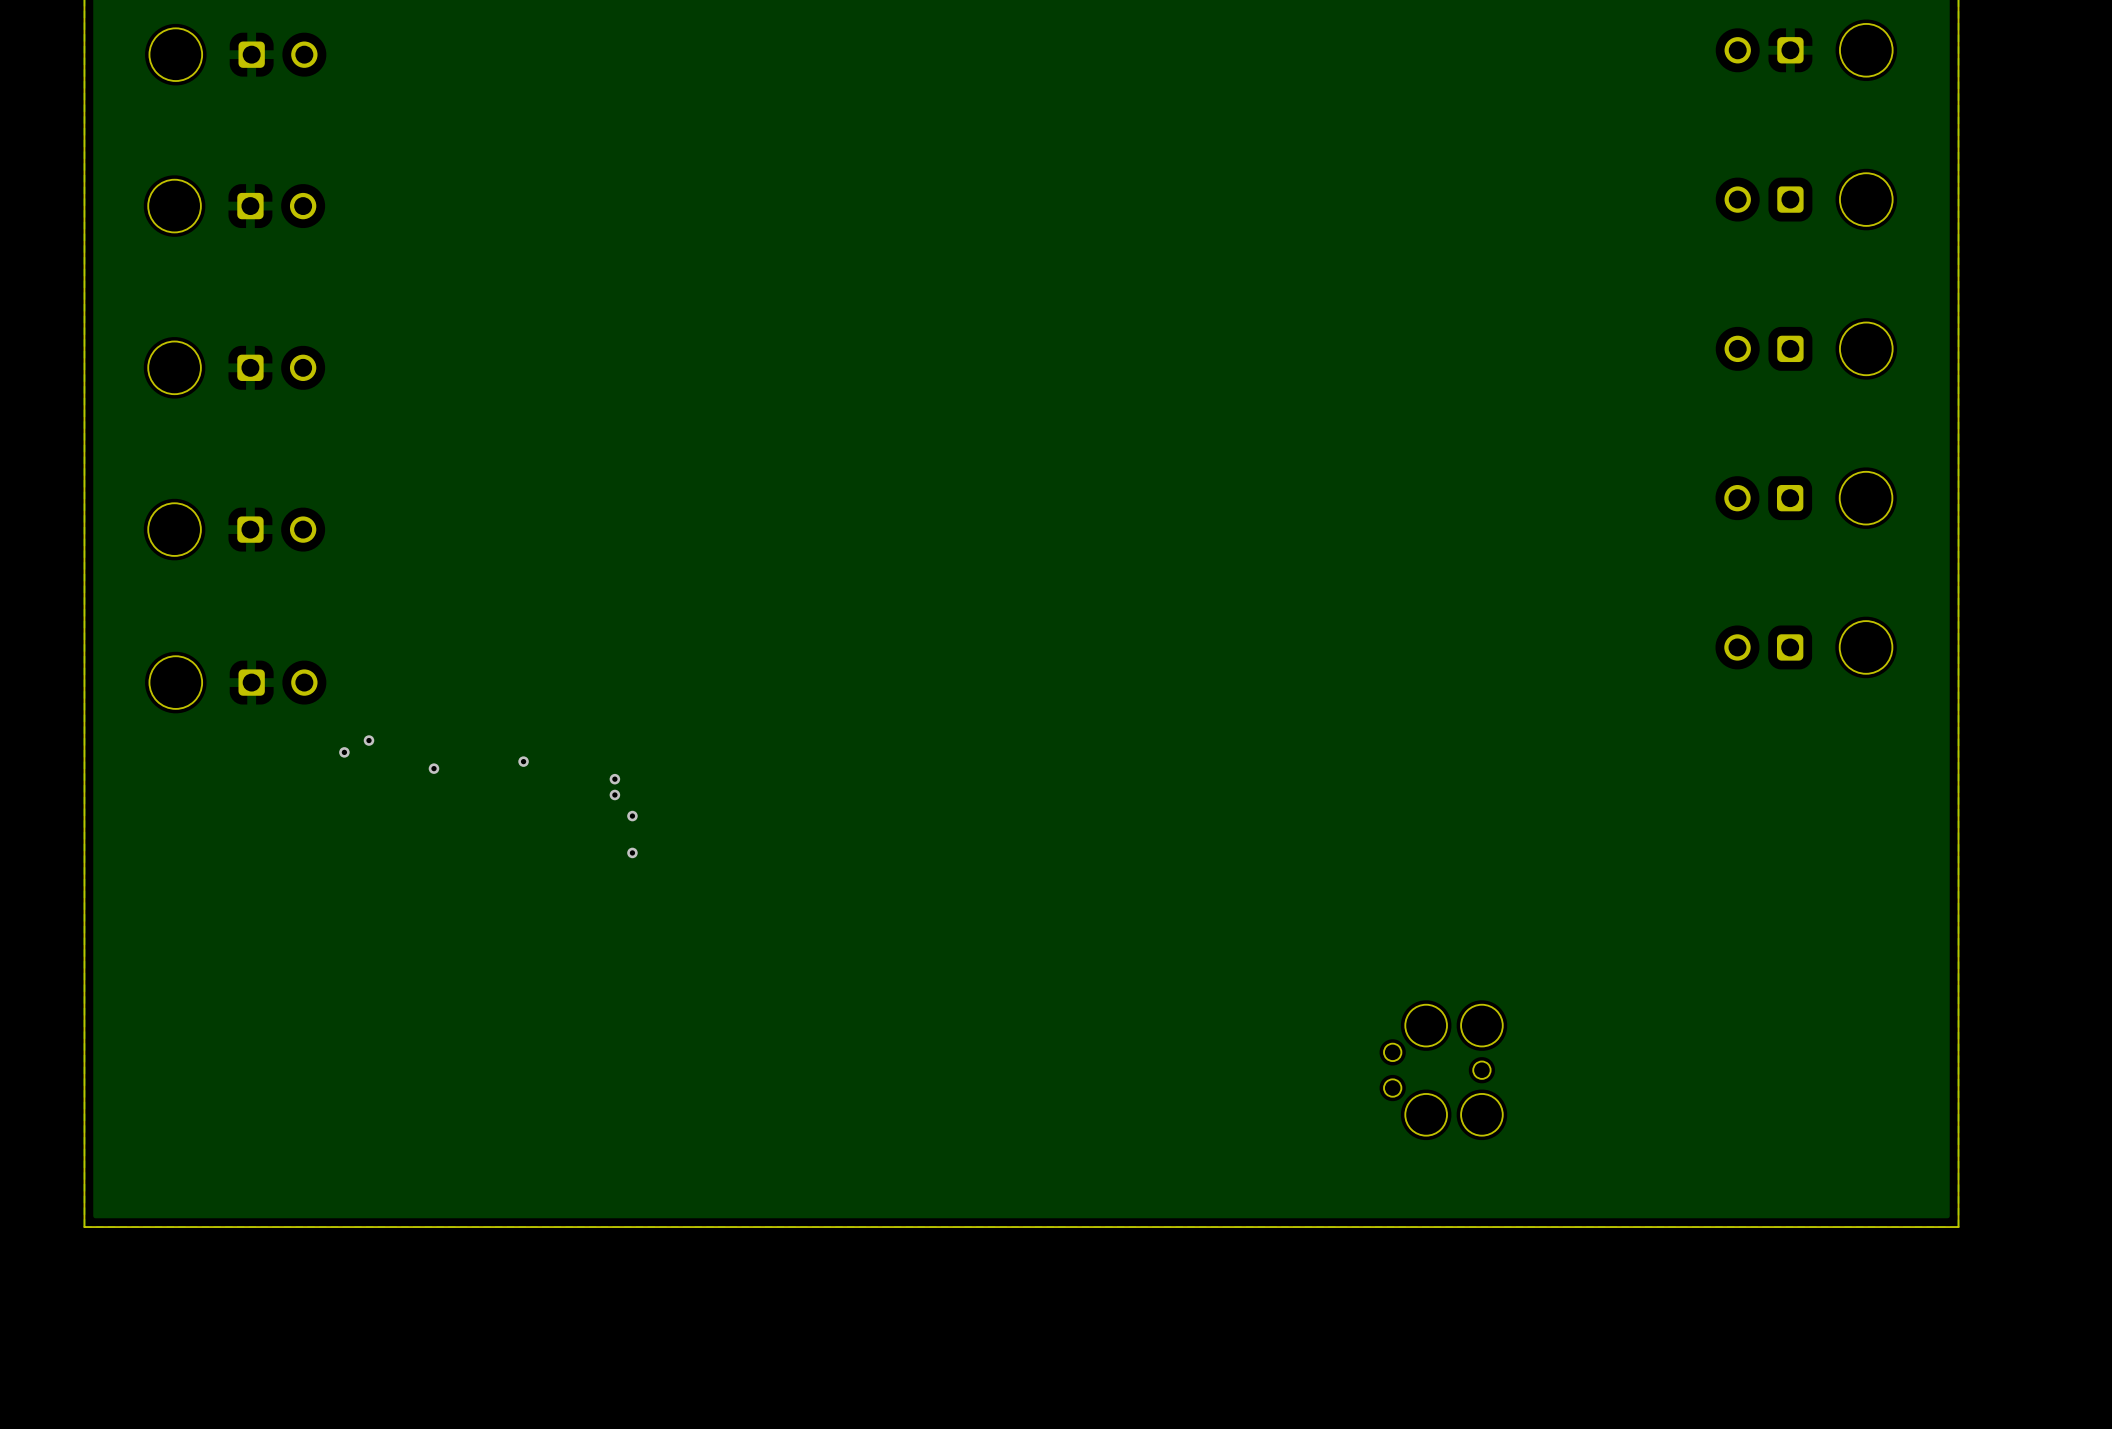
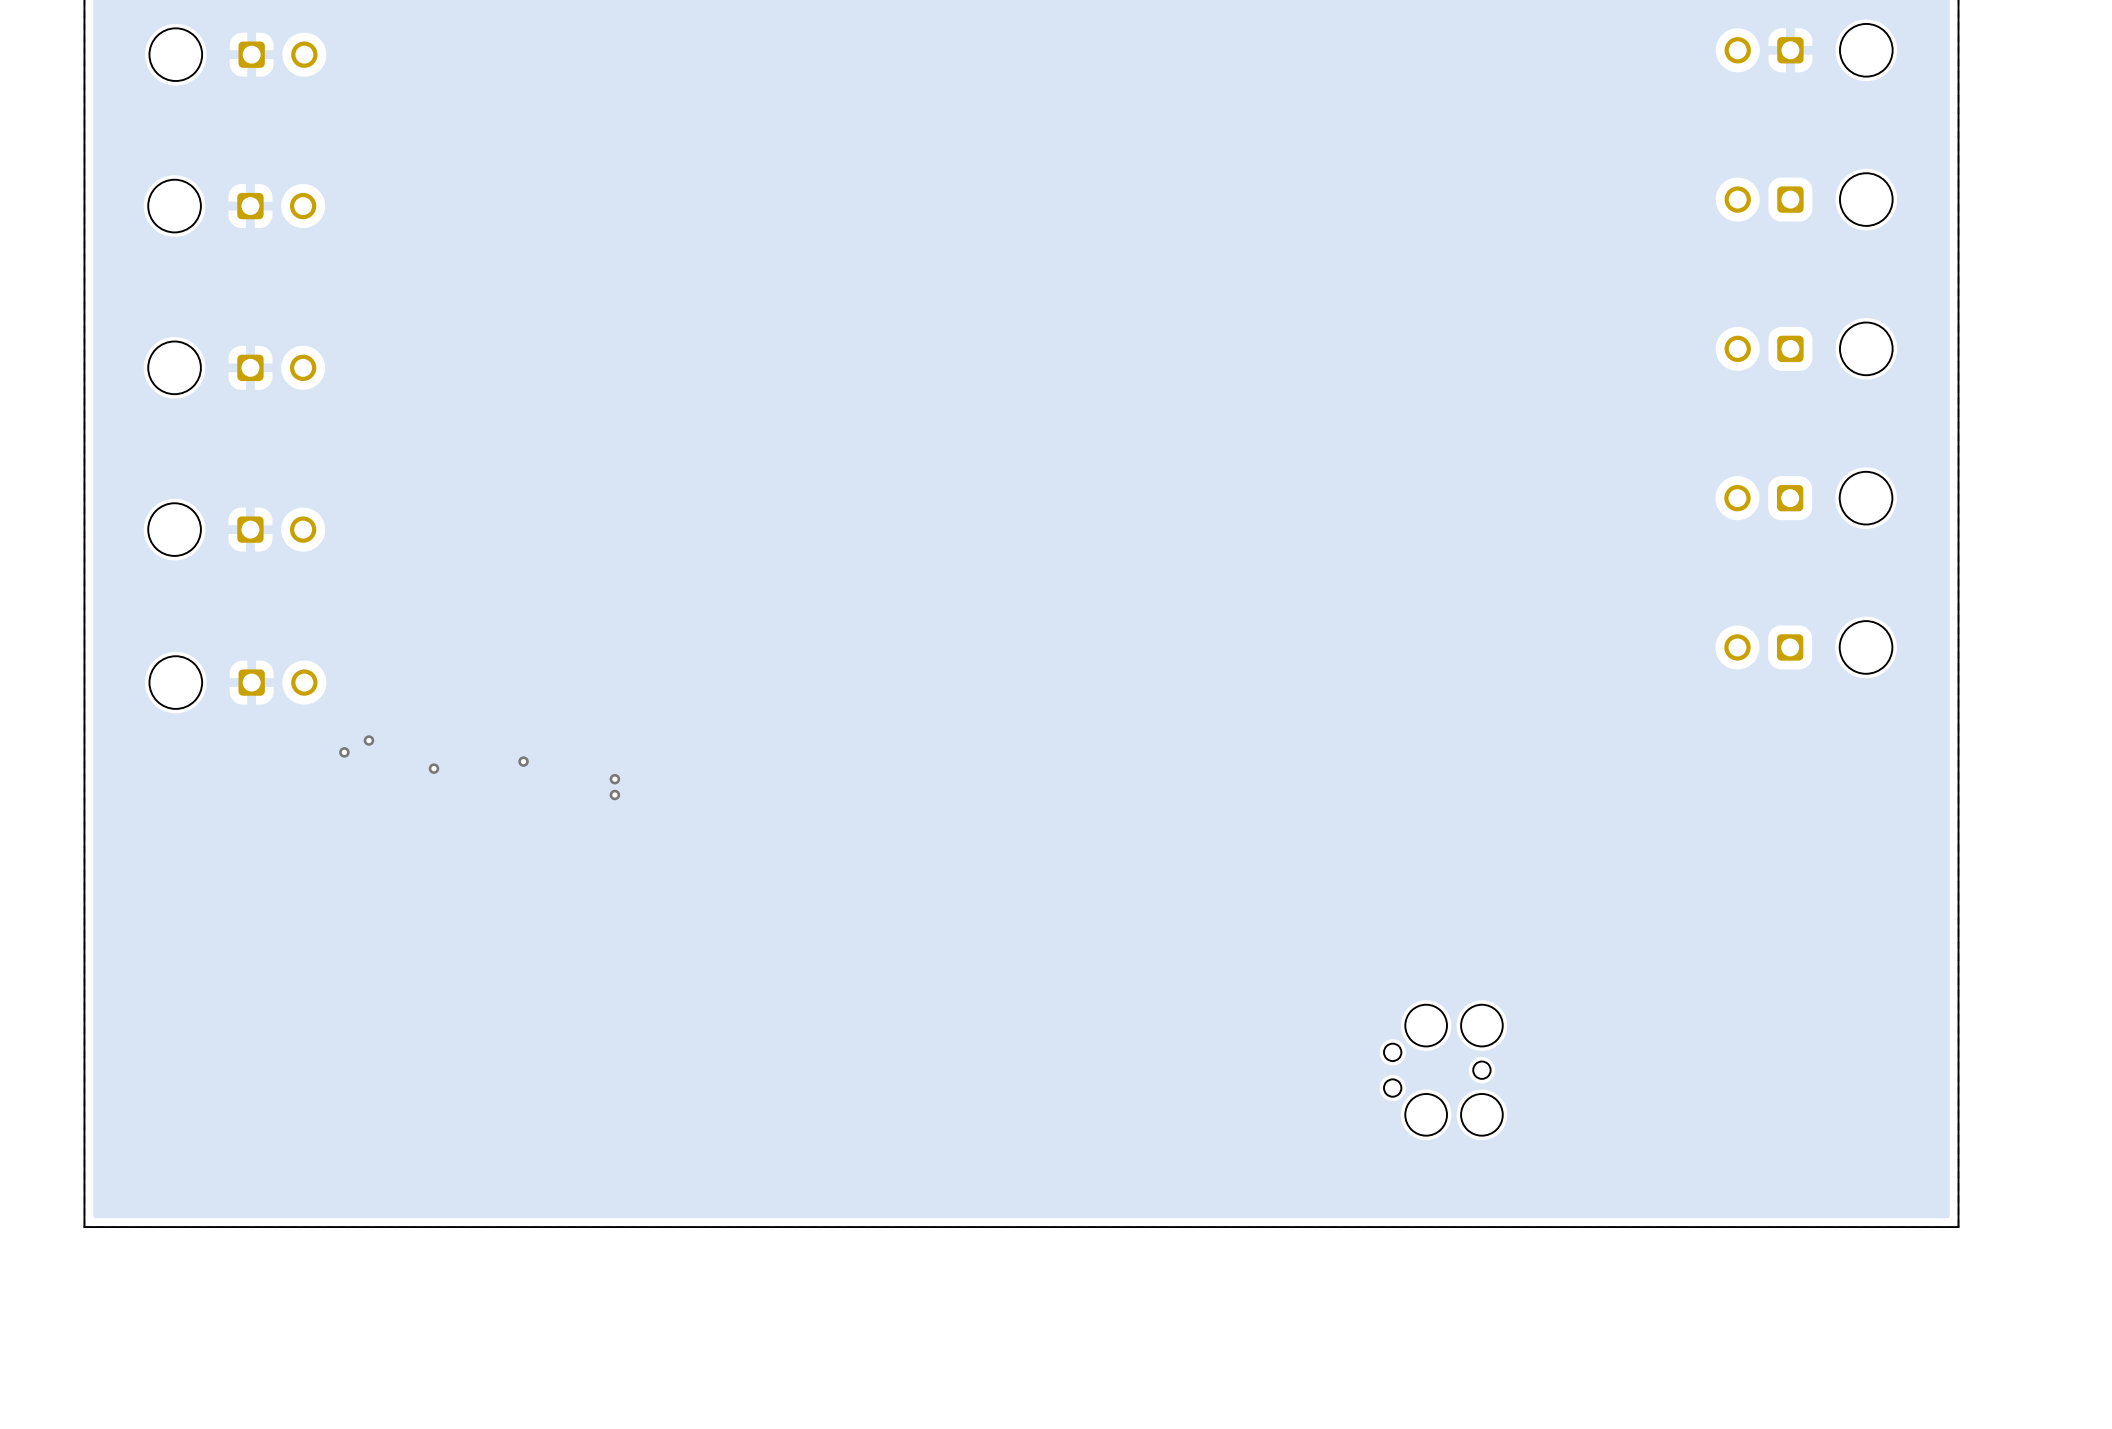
via: (632, 816) -> none
via: (632, 852) -> none

